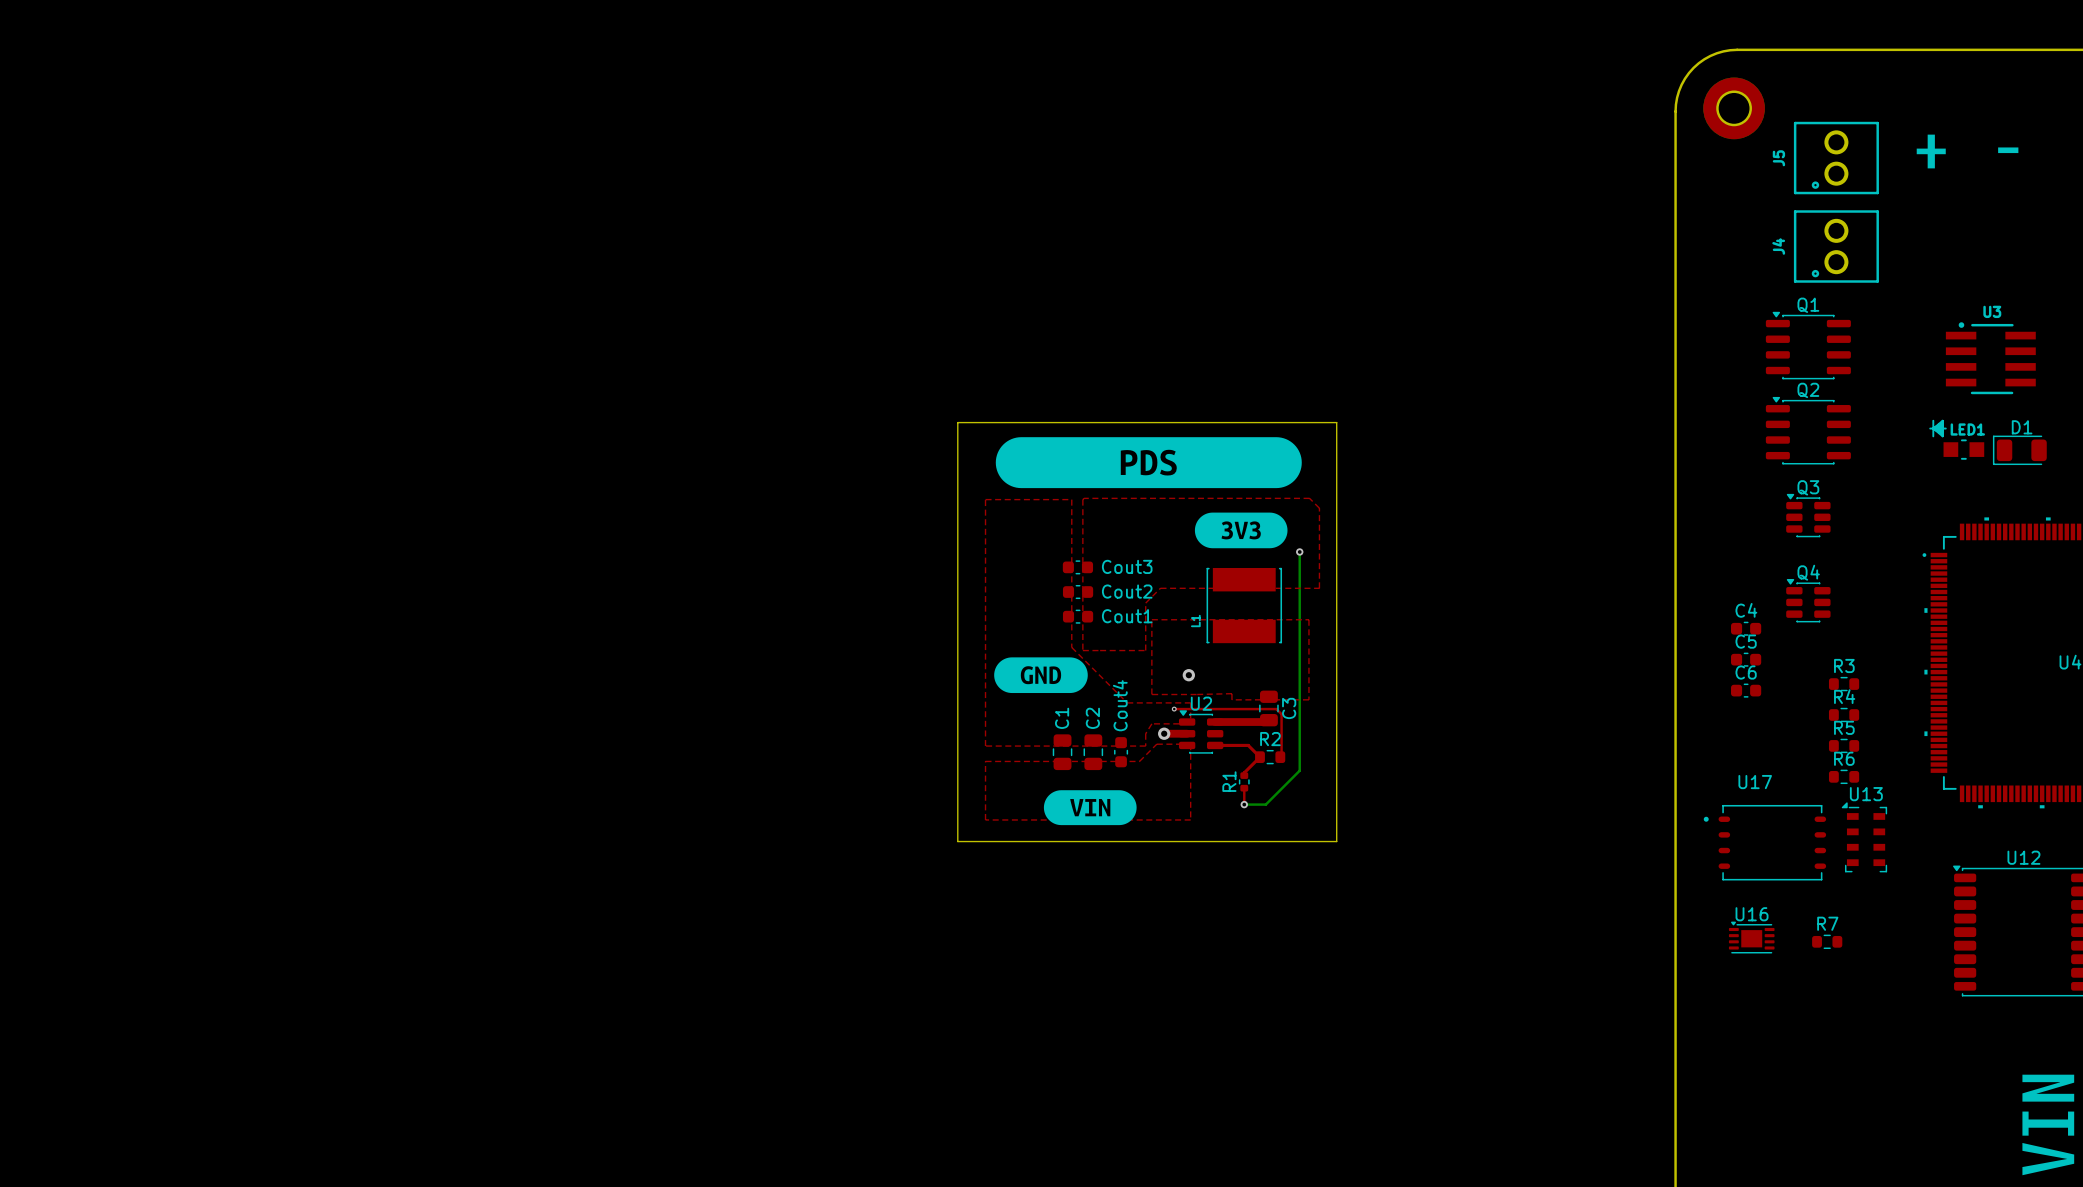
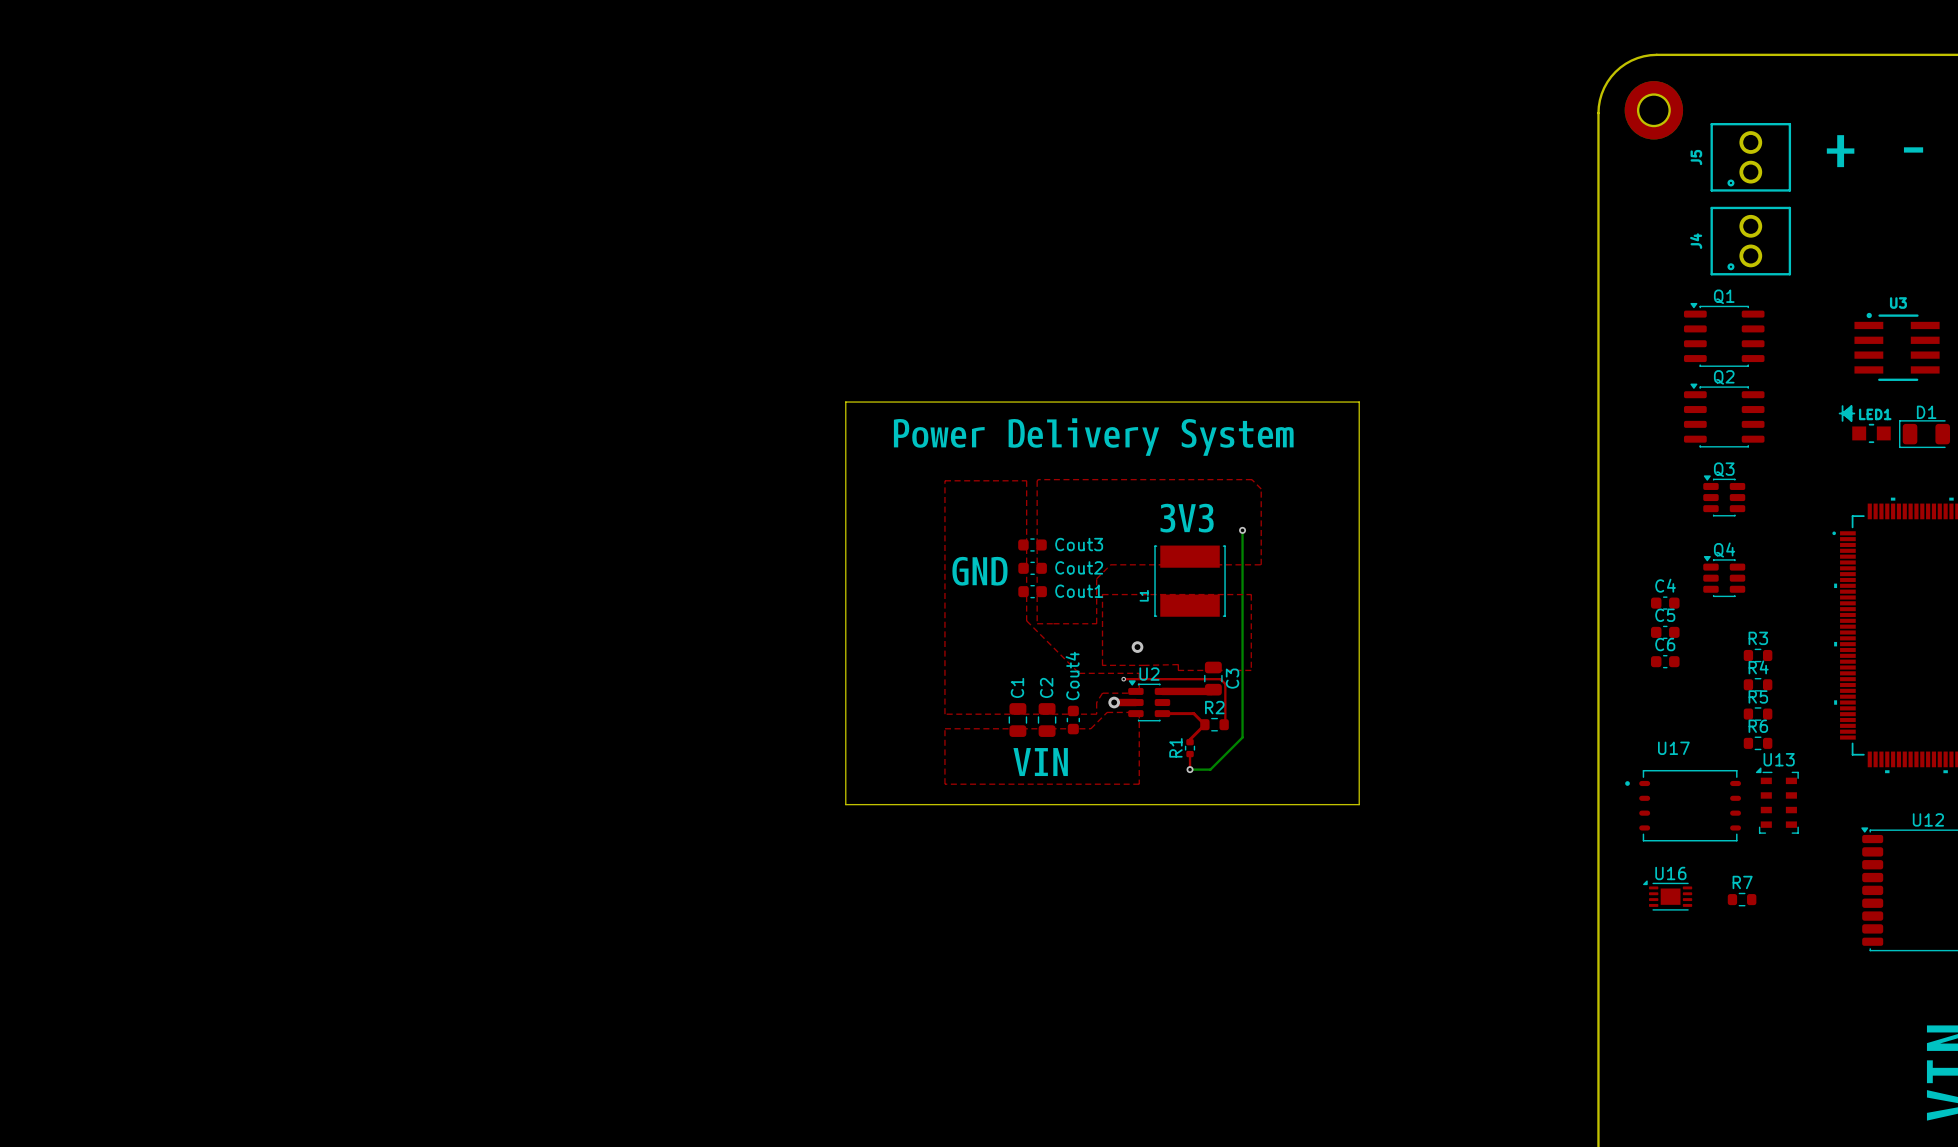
drawing shape: [995, 437, 1302, 489] -> [893, 418, 1294, 456]
drawing shape: [1194, 512, 1288, 549] -> [1160, 503, 1214, 533]
drawing: none -> [952, 556, 1008, 586]
drawing: [994, 657, 1088, 694] -> none
drawing shape: [1043, 790, 1137, 826] -> [1013, 748, 1068, 777]
board edge: (957, 841) (957, 422) (1336, 422) (1336, 841) -> (918, 804) (845, 804) (845, 402) (1359, 402) (1359, 804) (1277, 804)
U16 footprint: [1728, 921, 1775, 954] -> [1643, 880, 1693, 911]

